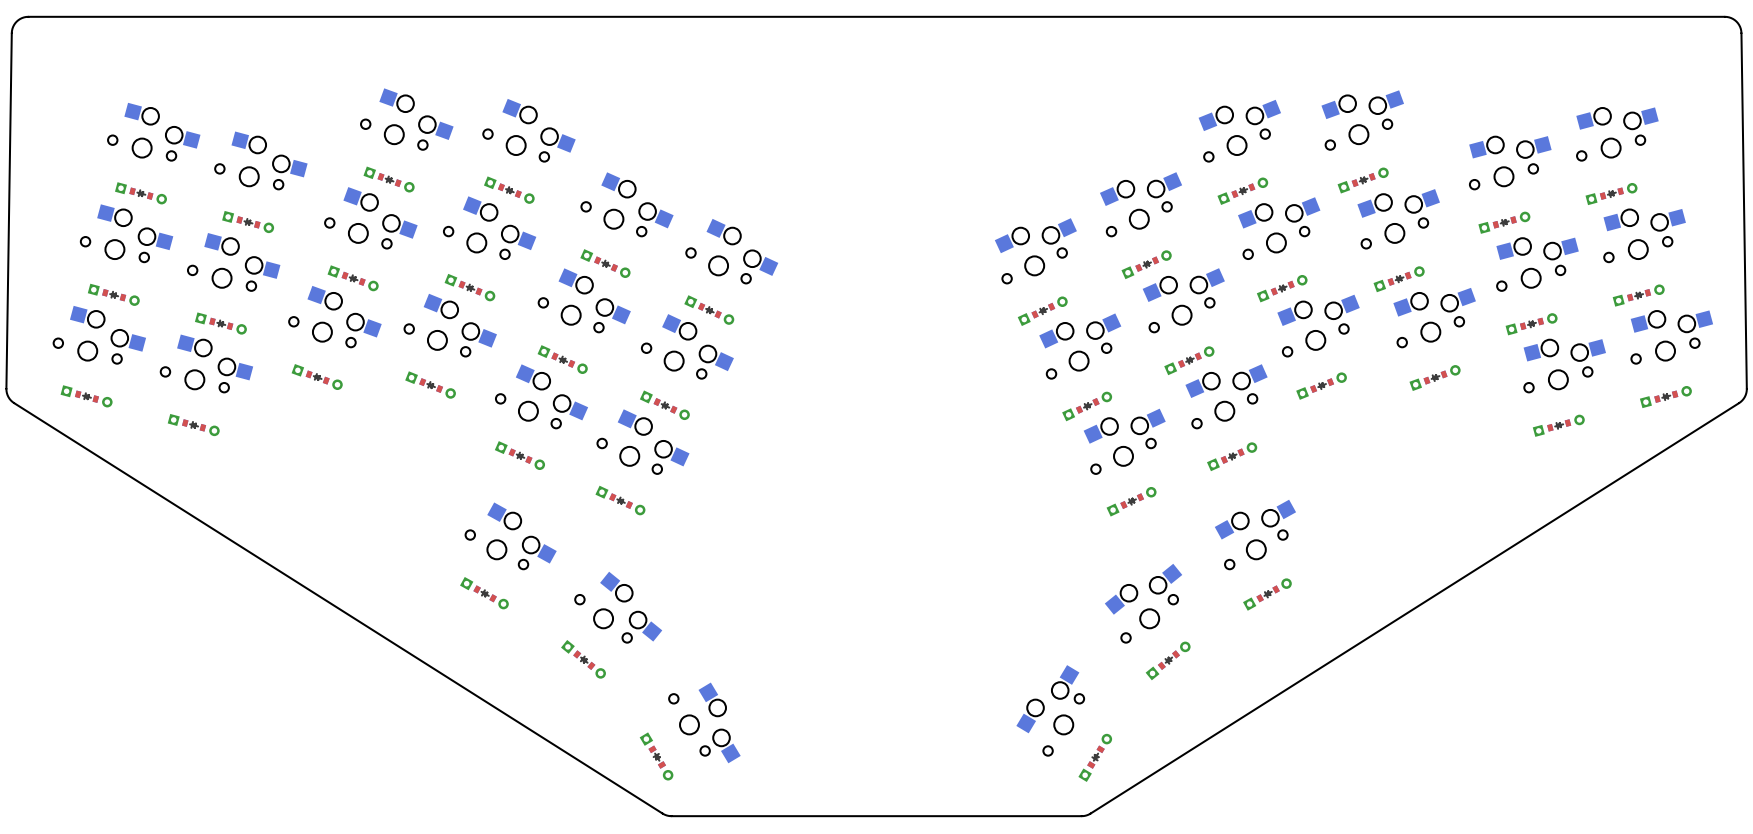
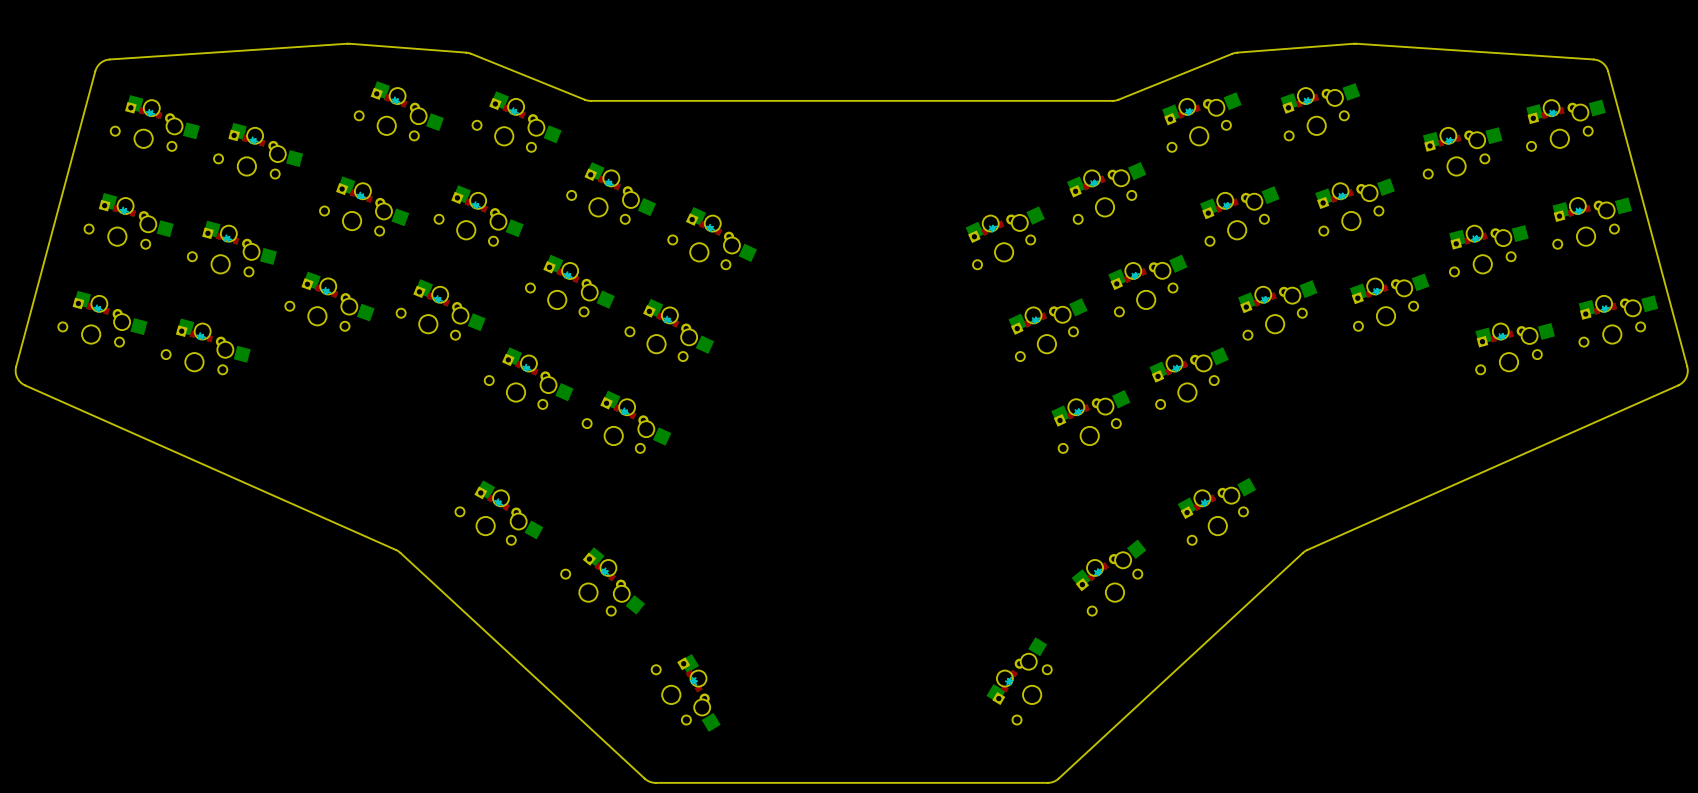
part: none -> (395, 100)
part: none -> (1307, 101)
part: none -> (513, 111)
part: none -> (150, 112)
part: none -> (1188, 112)
part: none -> (1552, 113)
part: none -> (253, 140)
part: none -> (1449, 141)
part position: (389, 179) -> (360, 195)
part position: (1363, 180) -> (1341, 196)
part position: (509, 190) -> (475, 204)
part position: (1242, 191) -> (1226, 206)
part position: (140, 193) -> (123, 210)
part: none -> (608, 182)
part: none -> (1093, 183)
part position: (1611, 194) -> (1578, 211)
part position: (248, 222) -> (227, 238)
part: (1504, 222) -> none
part: none -> (710, 227)
part: none -> (992, 228)
part: none -> (1475, 238)
part: (605, 263) -> none
part position: (1146, 264) -> (1134, 276)
part position: (353, 278) -> (326, 290)
part position: (1399, 279) -> (1376, 291)
part position: (469, 287) -> (437, 298)
part position: (1282, 288) -> (1264, 300)
part: none -> (567, 274)
part position: (113, 294) -> (97, 308)
part position: (1638, 295) -> (1605, 309)
part position: (709, 310) -> (667, 319)
part: (1042, 311) -> none
part position: (220, 323) -> (200, 336)
part position: (1531, 324) -> (1501, 336)
part: none -> (1035, 320)
part position: (562, 359) -> (526, 367)
part position: (1189, 360) -> (1175, 368)
part: (317, 377) -> none
part: (1435, 378) -> none
part: (430, 385) -> none
part: (1321, 386) -> none
part: (86, 396) -> none
part: (1665, 397) -> none
part position: (664, 405) -> (624, 411)
part position: (1087, 406) -> (1077, 412)
part: (193, 425) -> none
part: (1558, 425) -> none
part: (519, 455) -> none
part: (1232, 456) -> none
part: (620, 500) -> none
part: (1131, 501) -> none
part position: (484, 593) -> (497, 502)
part position: (1267, 594) -> (1204, 503)
part: none -> (604, 571)
part: (583, 659) -> none
part position: (1168, 660) -> (1097, 572)
part: none -> (1008, 681)
part position: (656, 756) -> (693, 680)
part: (1095, 757) -> none
board edge: (673, 816) (662, 813) (10, 400) (6, 388) (11, 33) (13, 26) (18, 20) (28, 16) (1724, 16) (1734, 20) (1739, 24) (1741, 33) (1746, 388) (1742, 400) (1090, 813) (1080, 816) -> (655, 782) (644, 778) (398, 551) (25, 385) (19, 380) (15, 374) (16, 366) (95, 71) (100, 63) (109, 59) (348, 43) (466, 52) (590, 100) (1114, 100) (1234, 53) (1355, 43) (1593, 59) (1602, 63) (1608, 71) (1687, 366) (1687, 374) (1684, 380) (1678, 385) (1305, 551) (1058, 778) (1047, 782)

